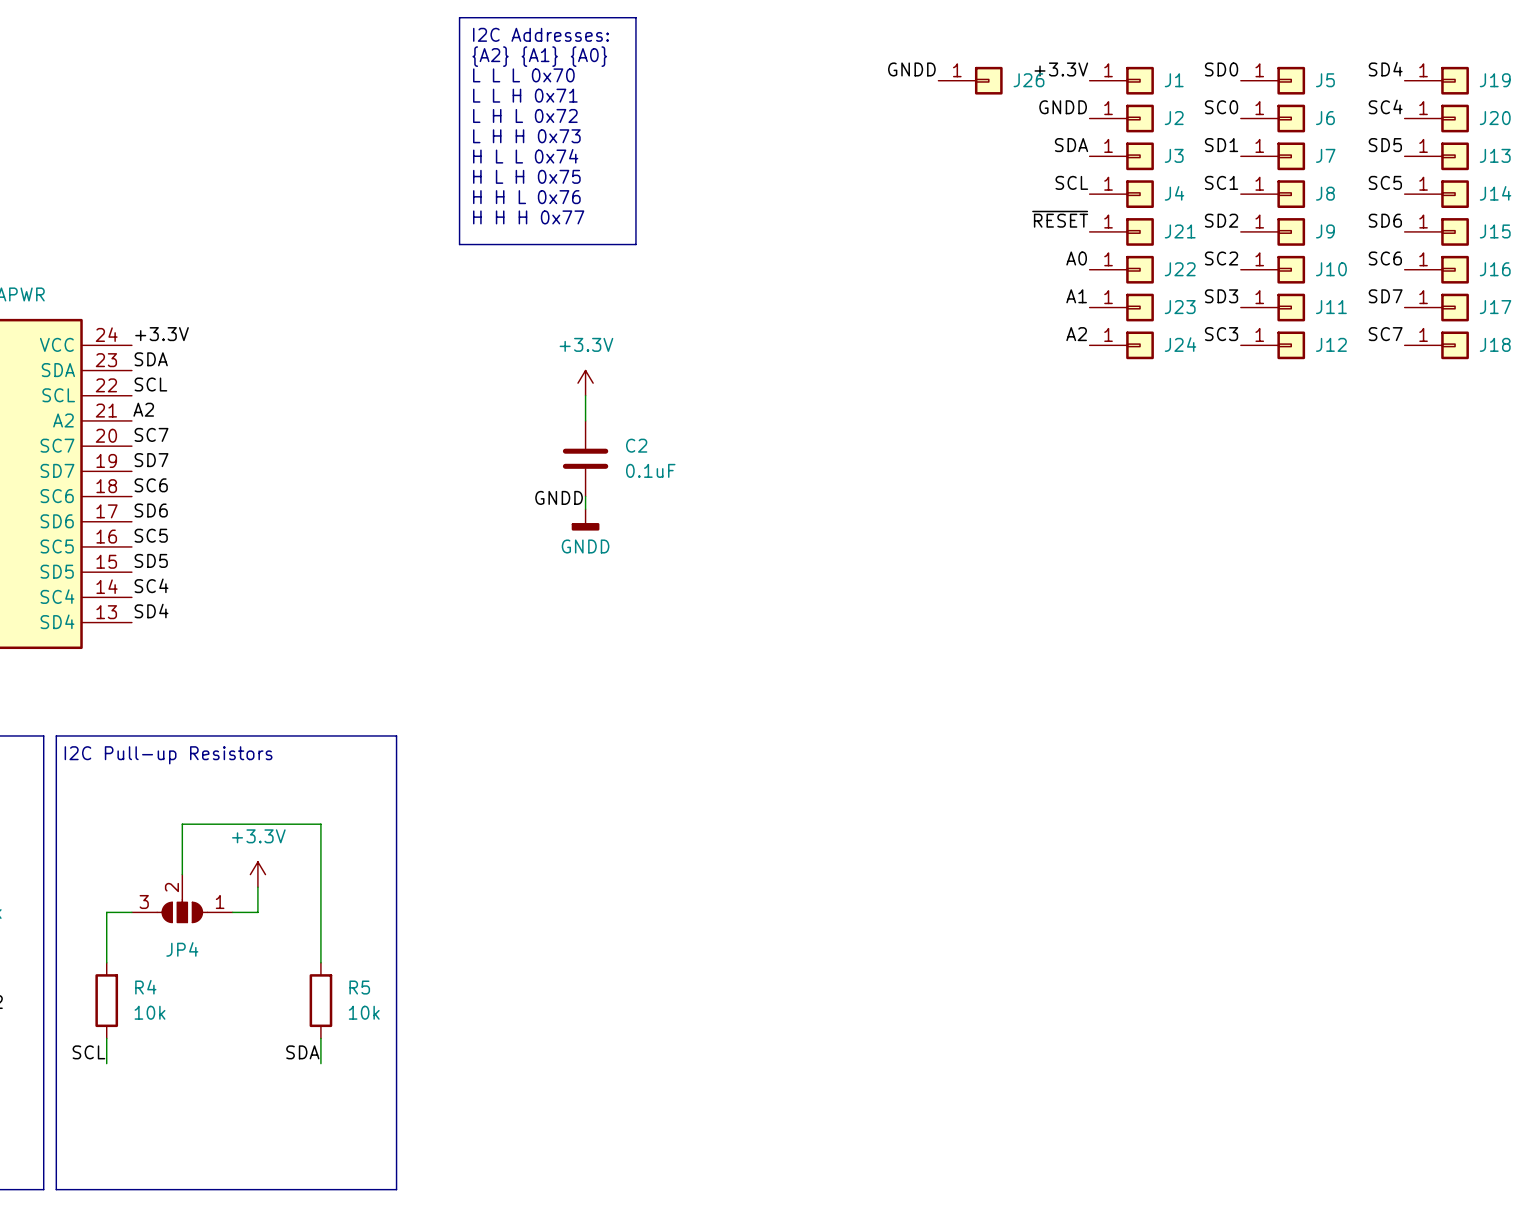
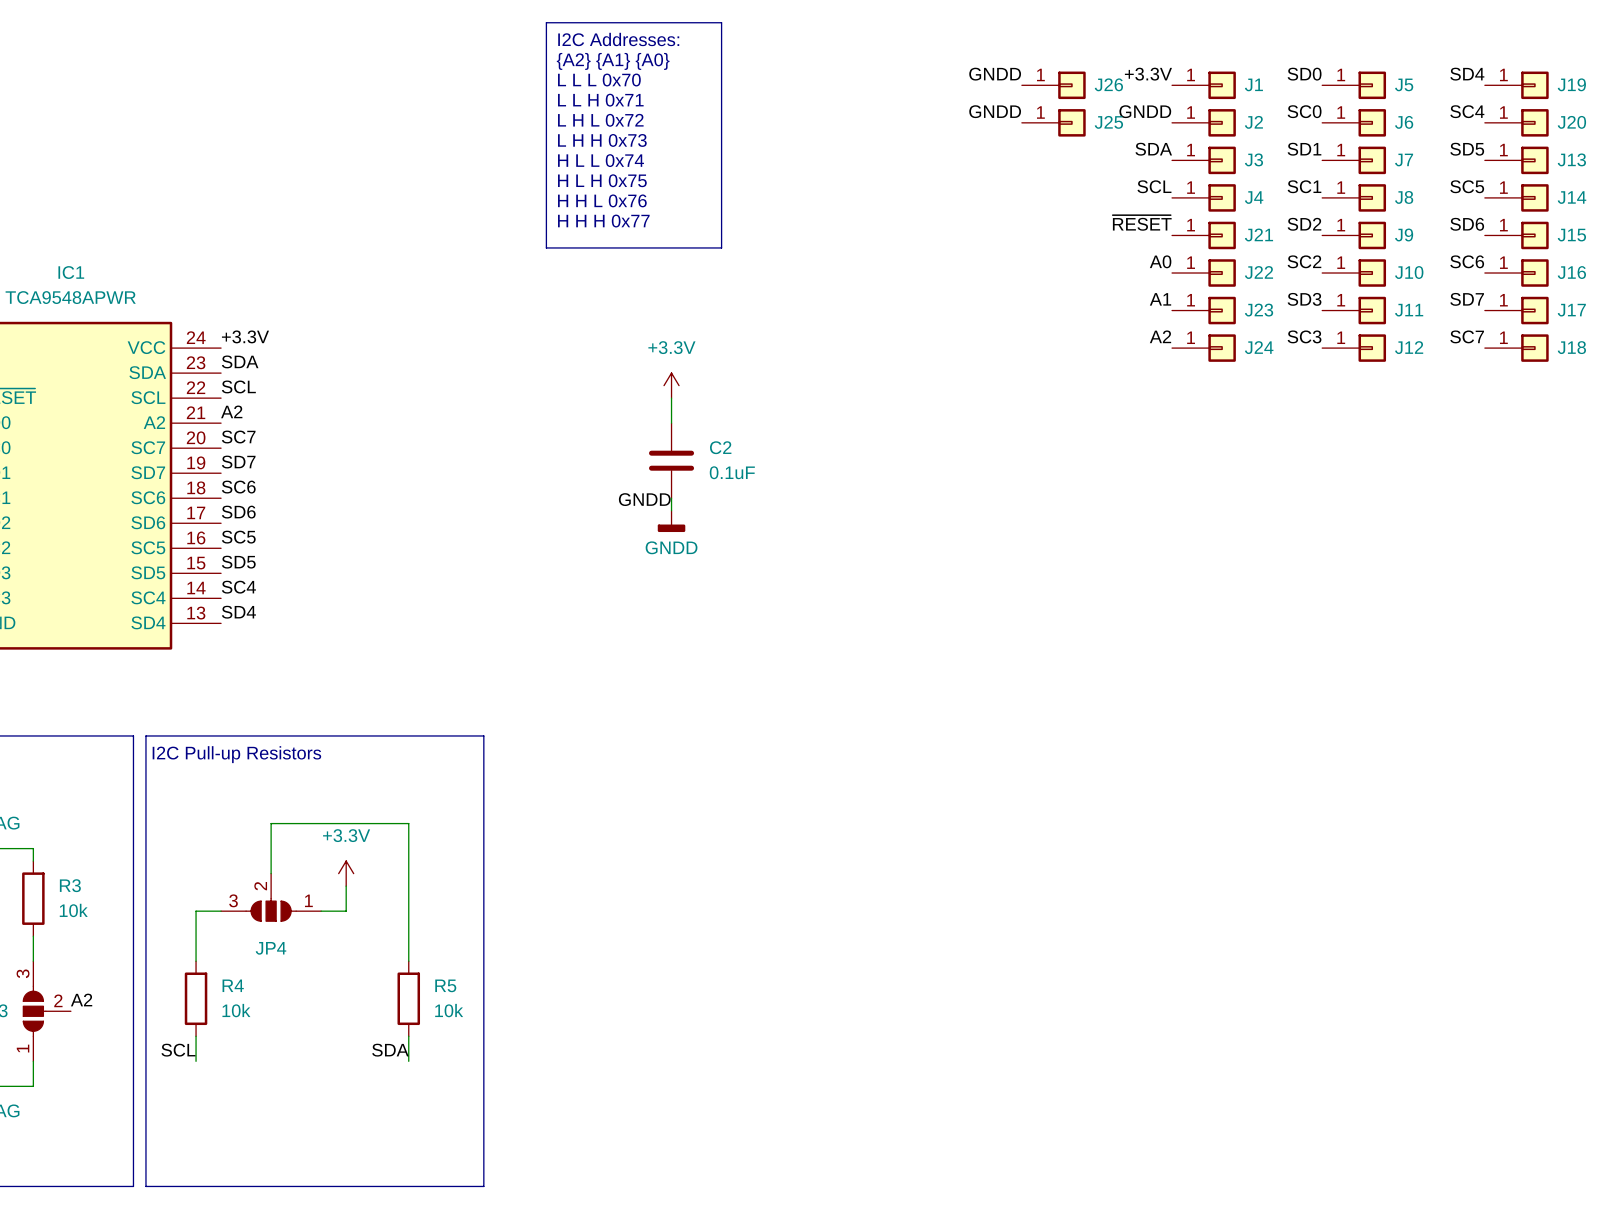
label: none -> GNDD (995, 111)
J25: none -> (1053, 122)

